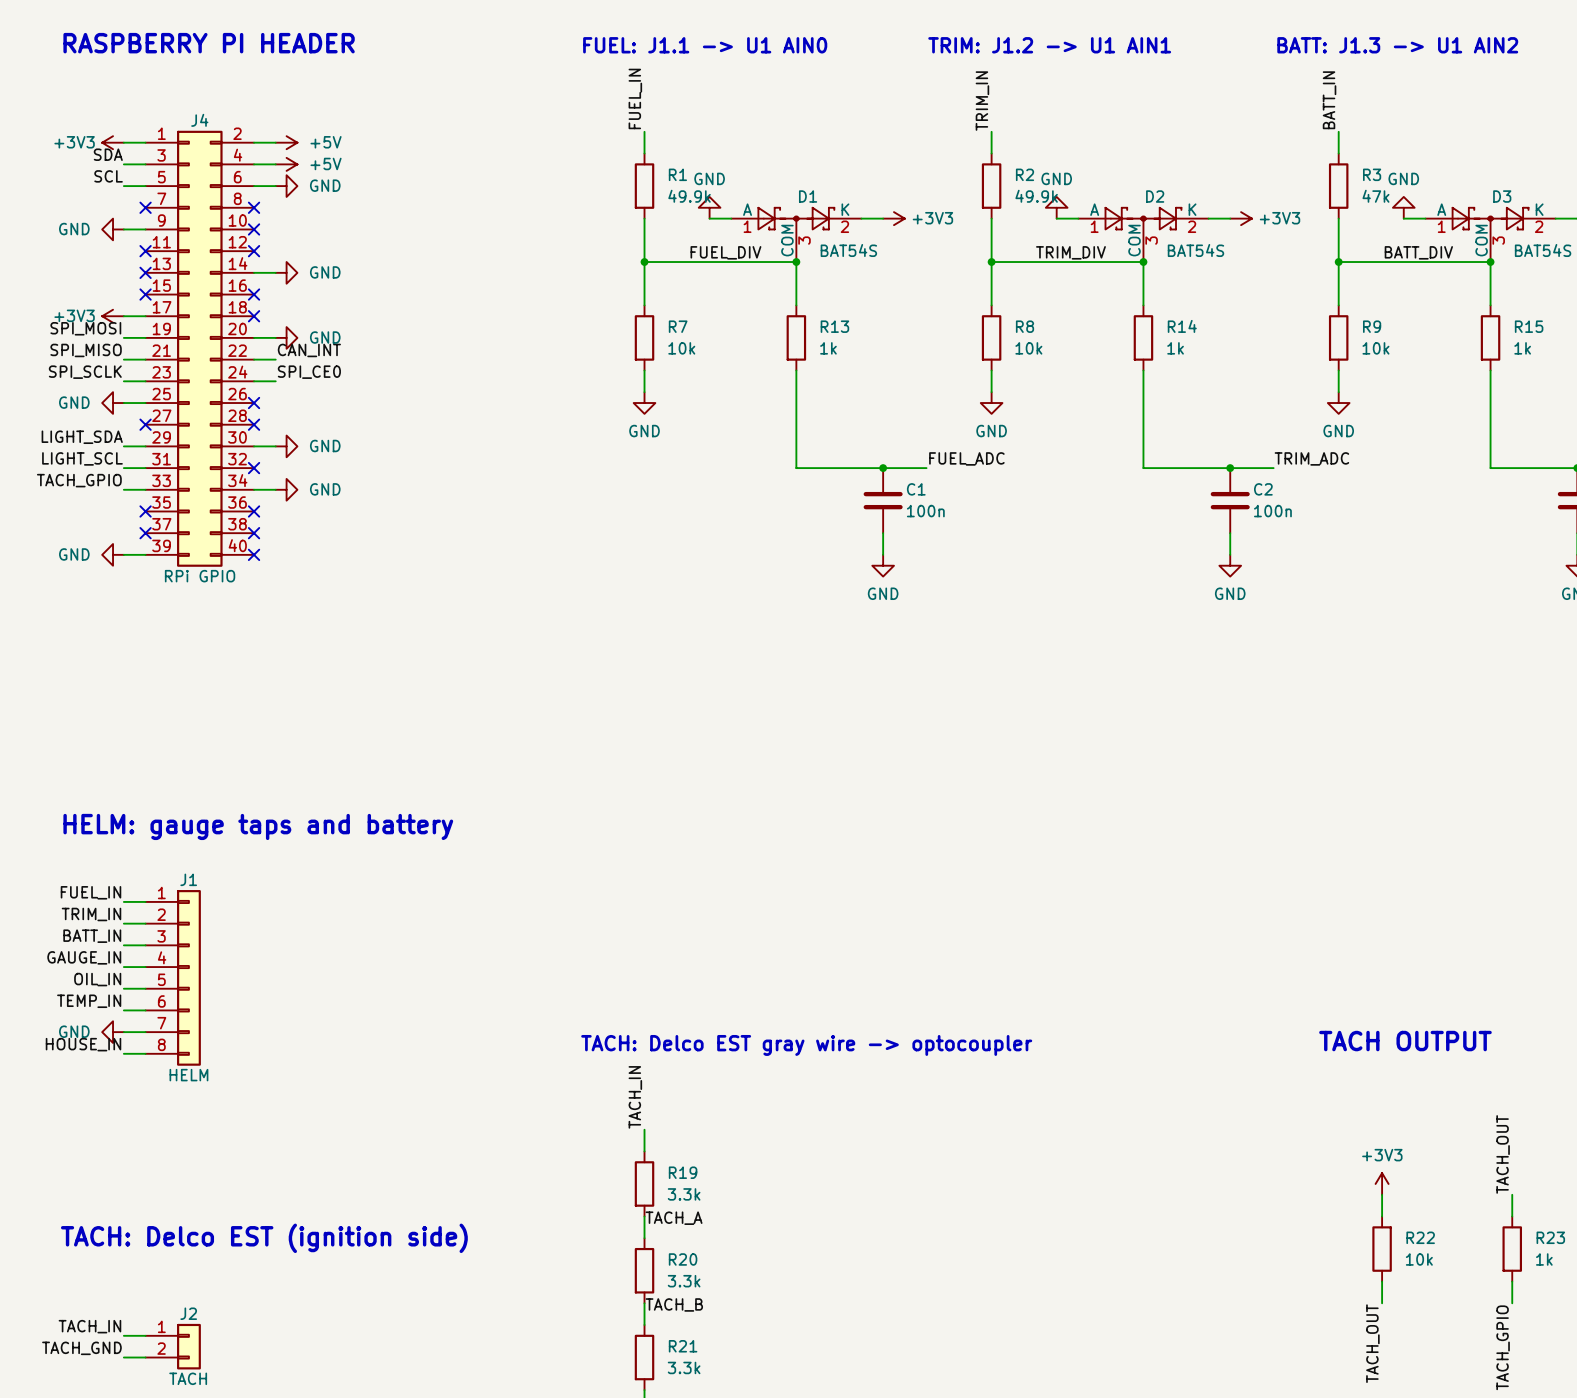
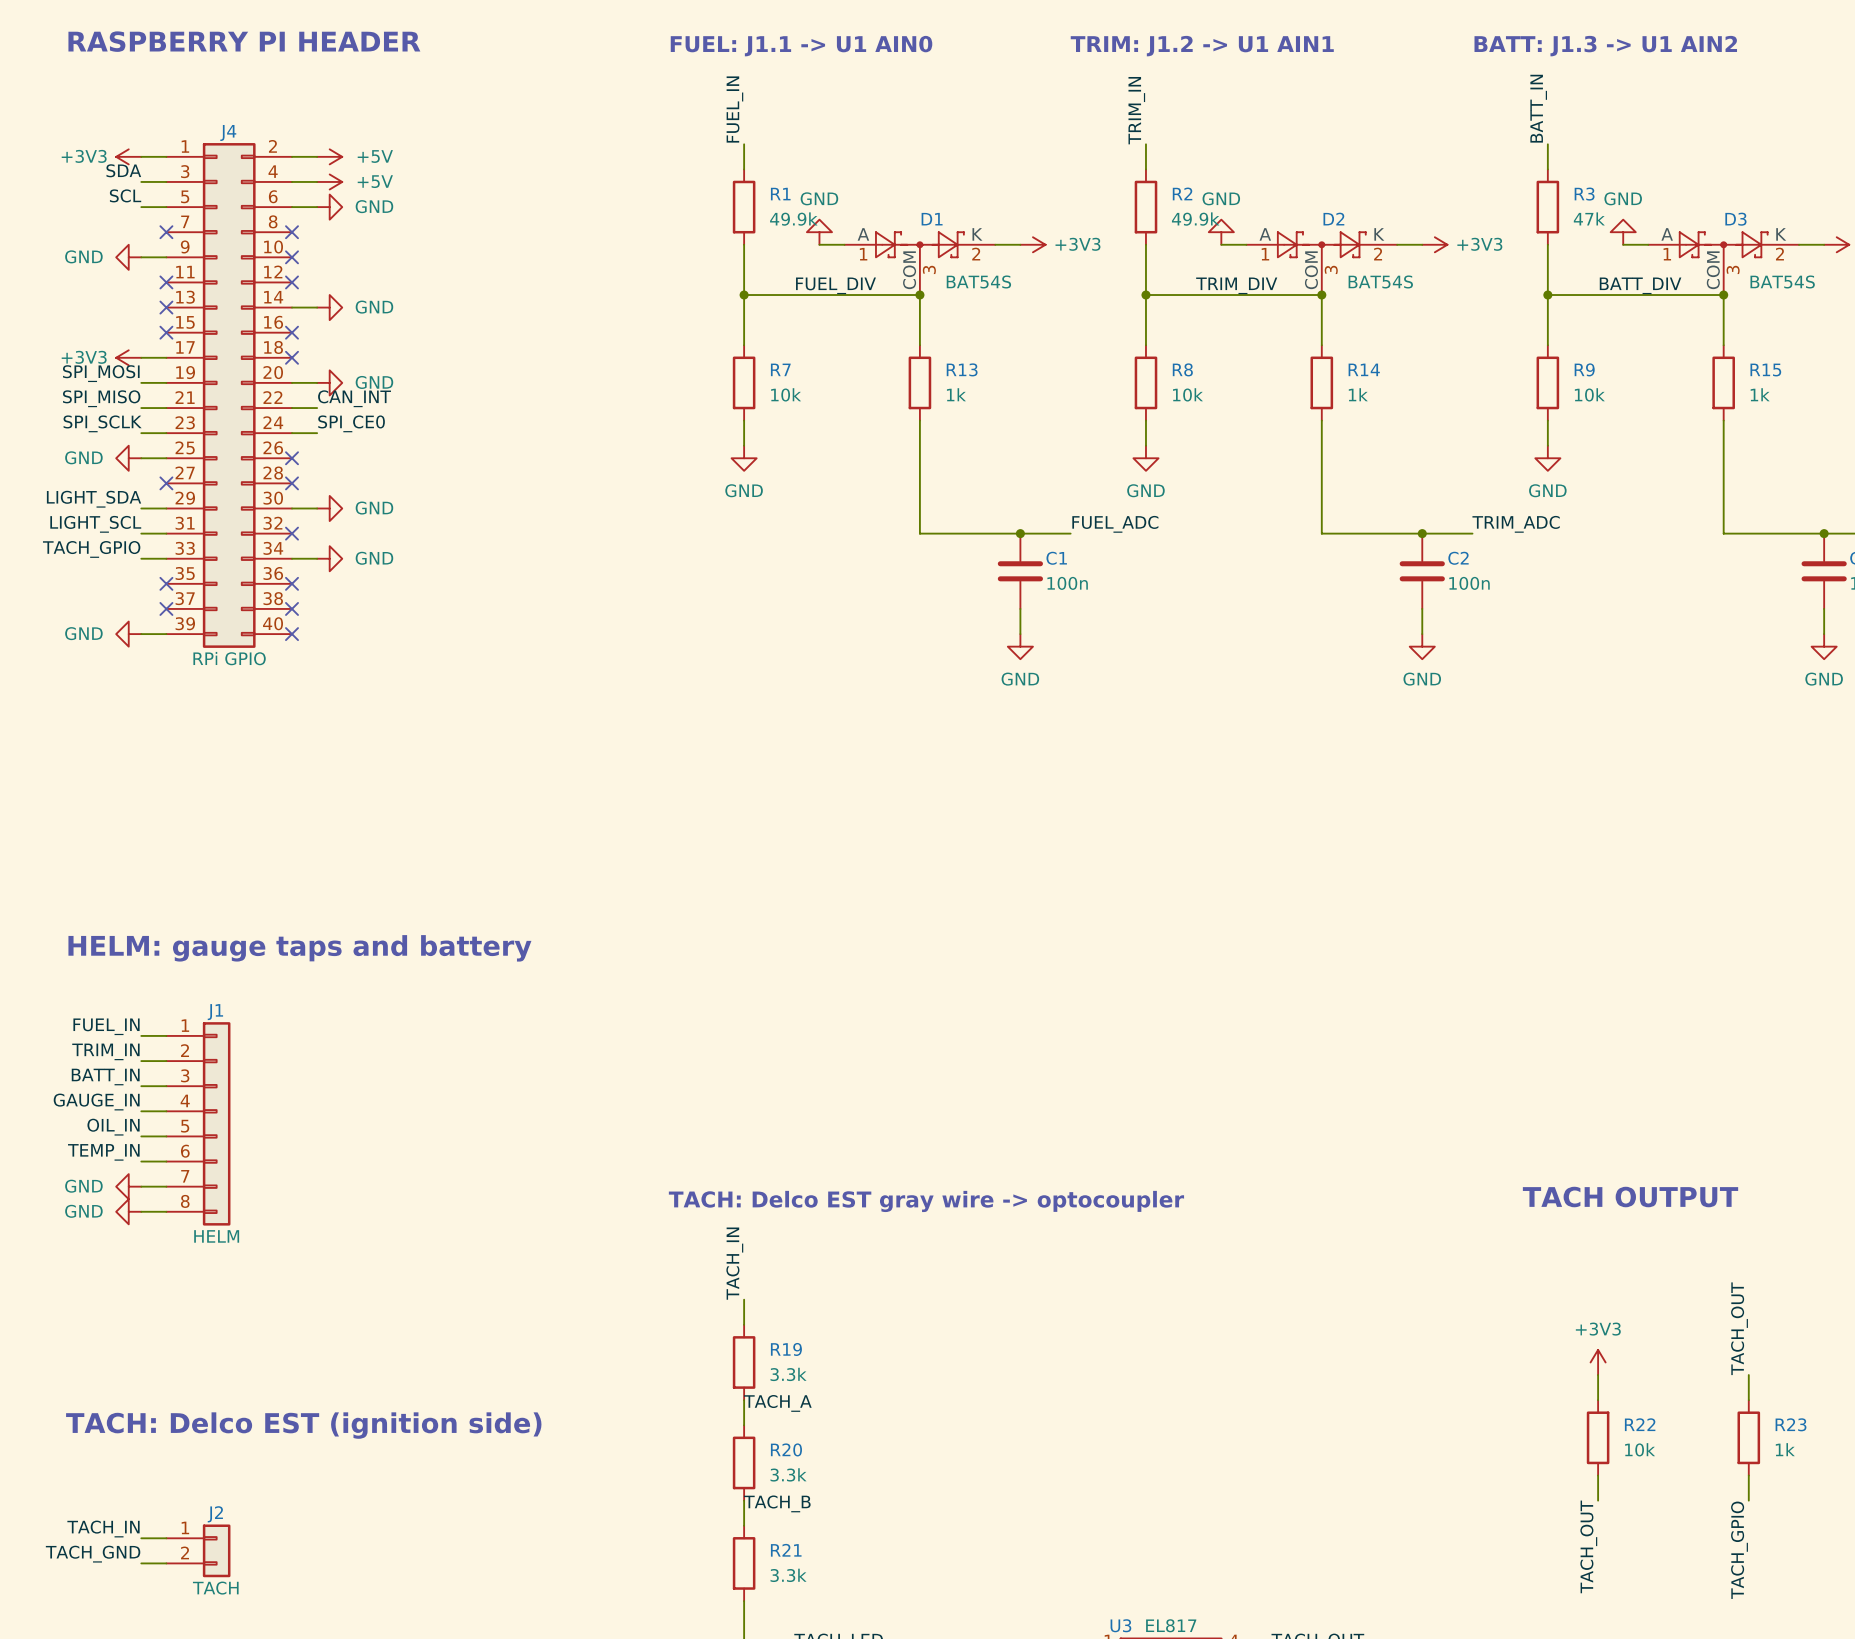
label: HOUSE_IN (83, 1044) -> none
power symbol: none -> GND (128, 1211)

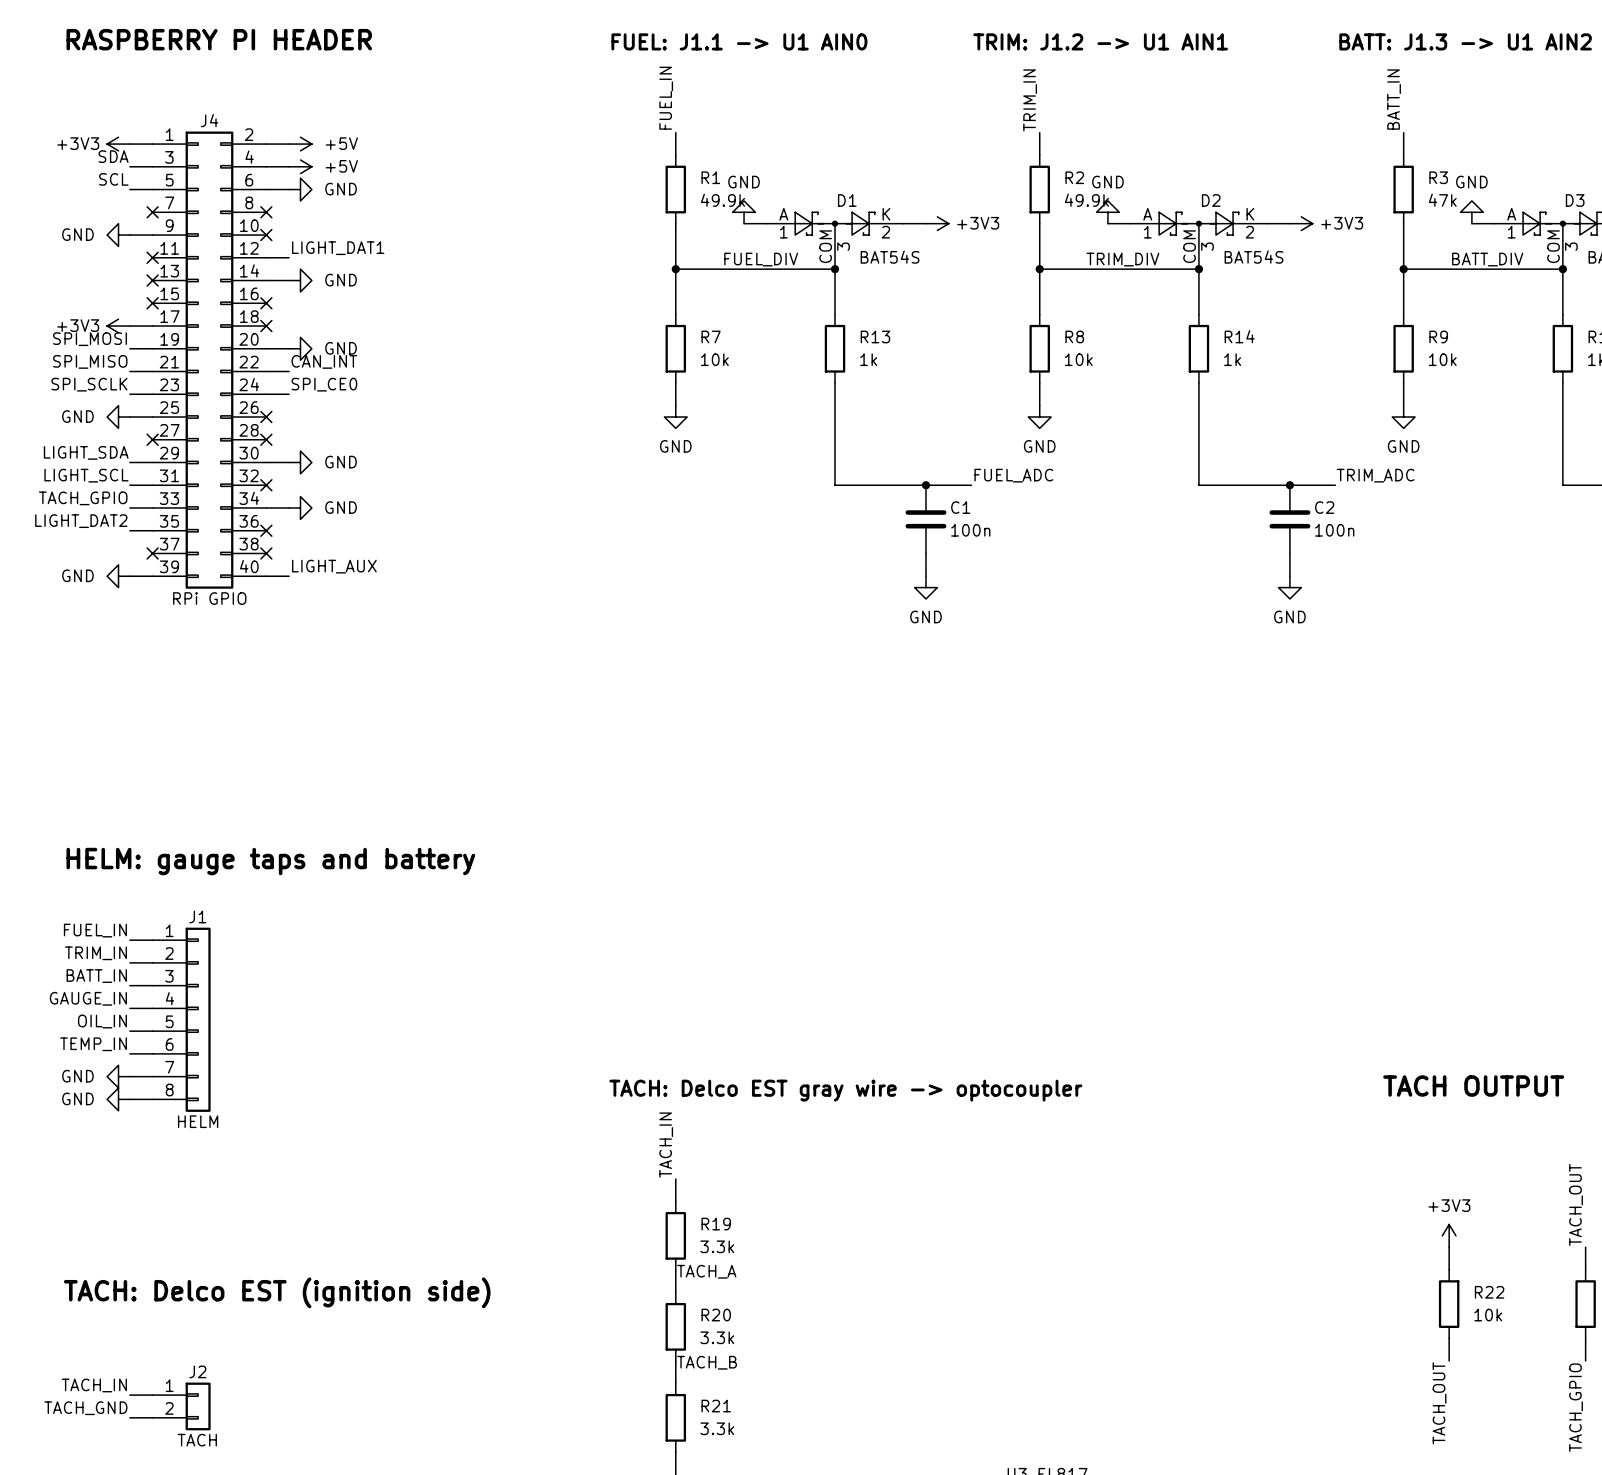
label: none -> LIGHT_DAT1 (338, 248)
wire: none -> (266, 257) (289, 257)
no-connect mark: (292, 282) -> none
label: none -> LIGHT_DAT2 (81, 521)
wire: none -> (129, 530) (152, 530)
no-connect mark: (166, 583) -> none
label: none -> LIGHT_AUX (334, 566)
wire: none -> (266, 576) (289, 576)
no-connect mark: (292, 634) -> none

